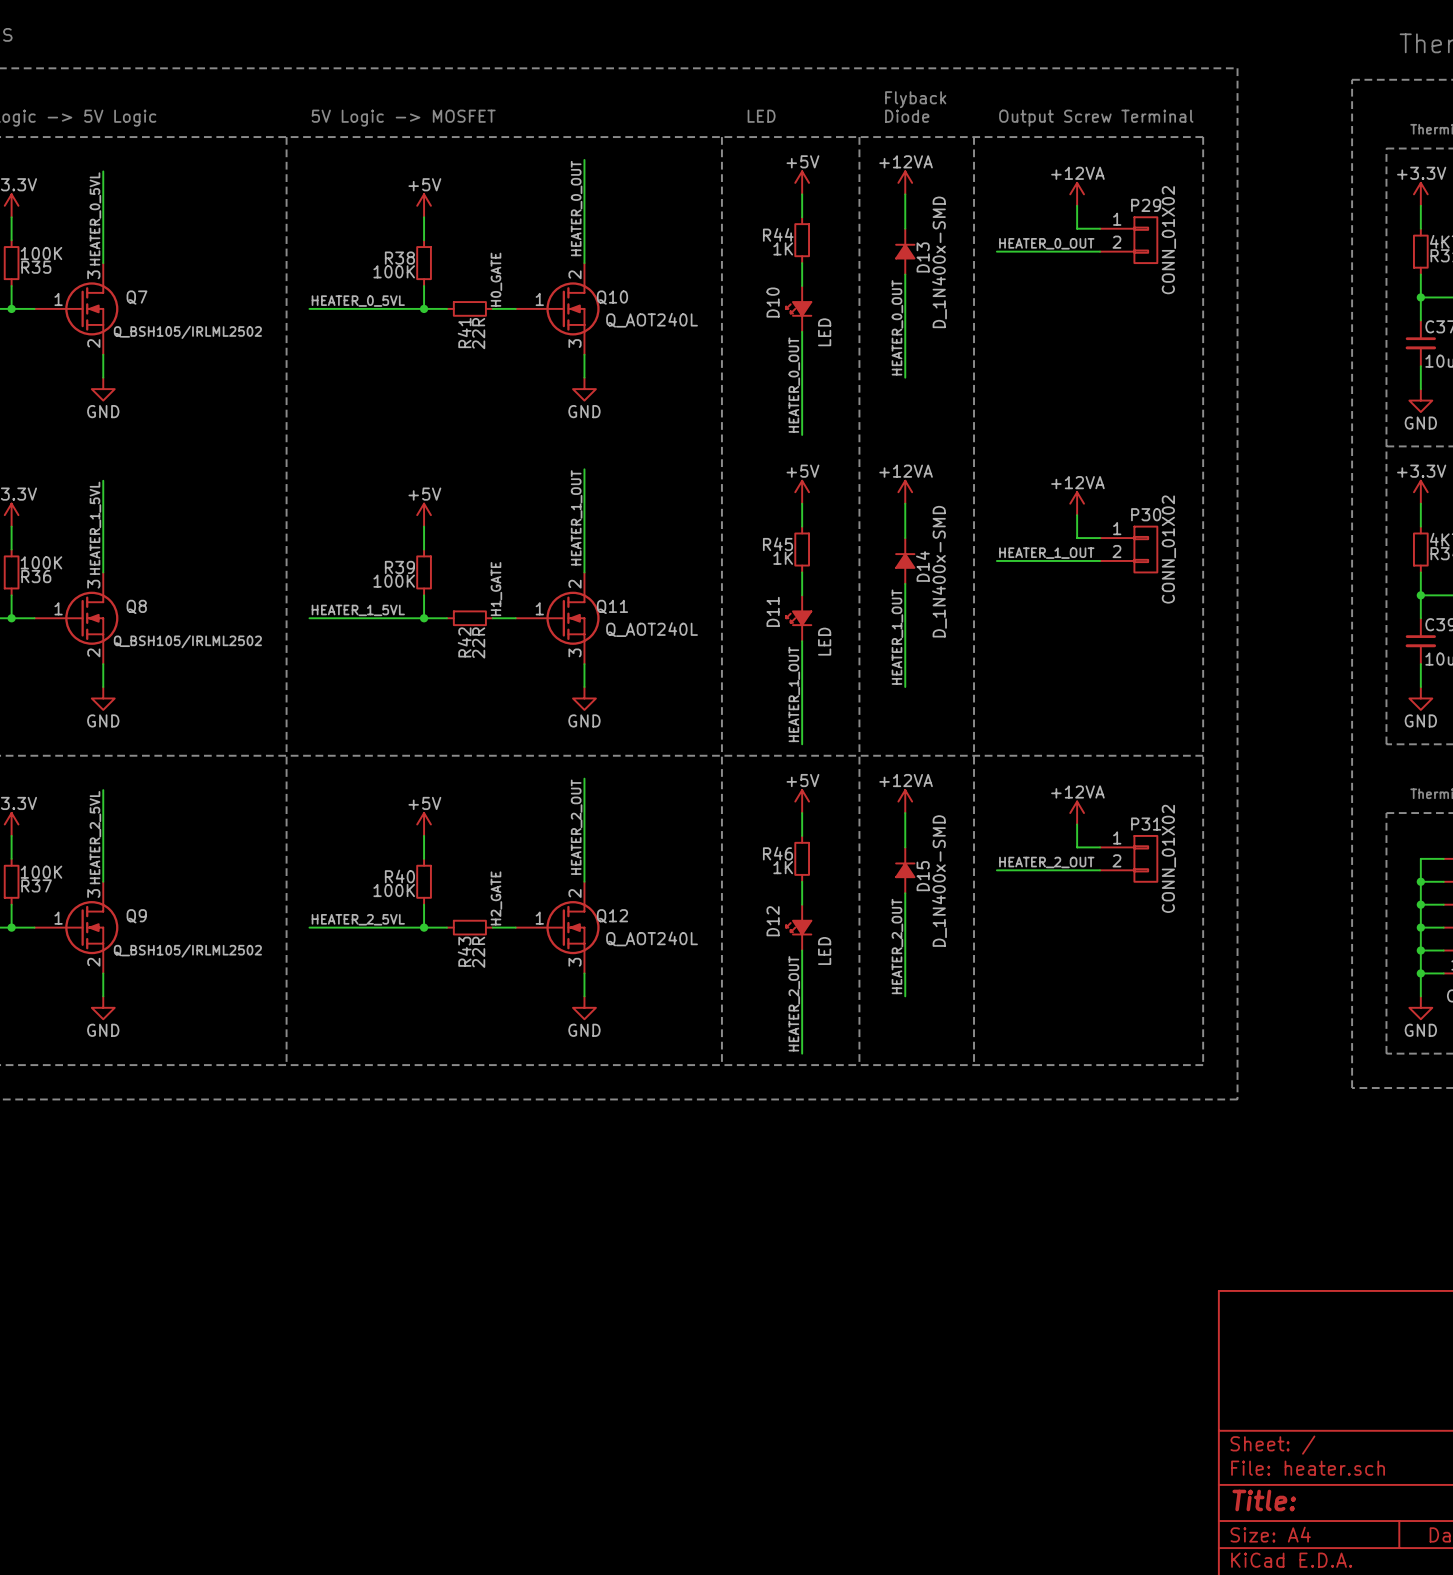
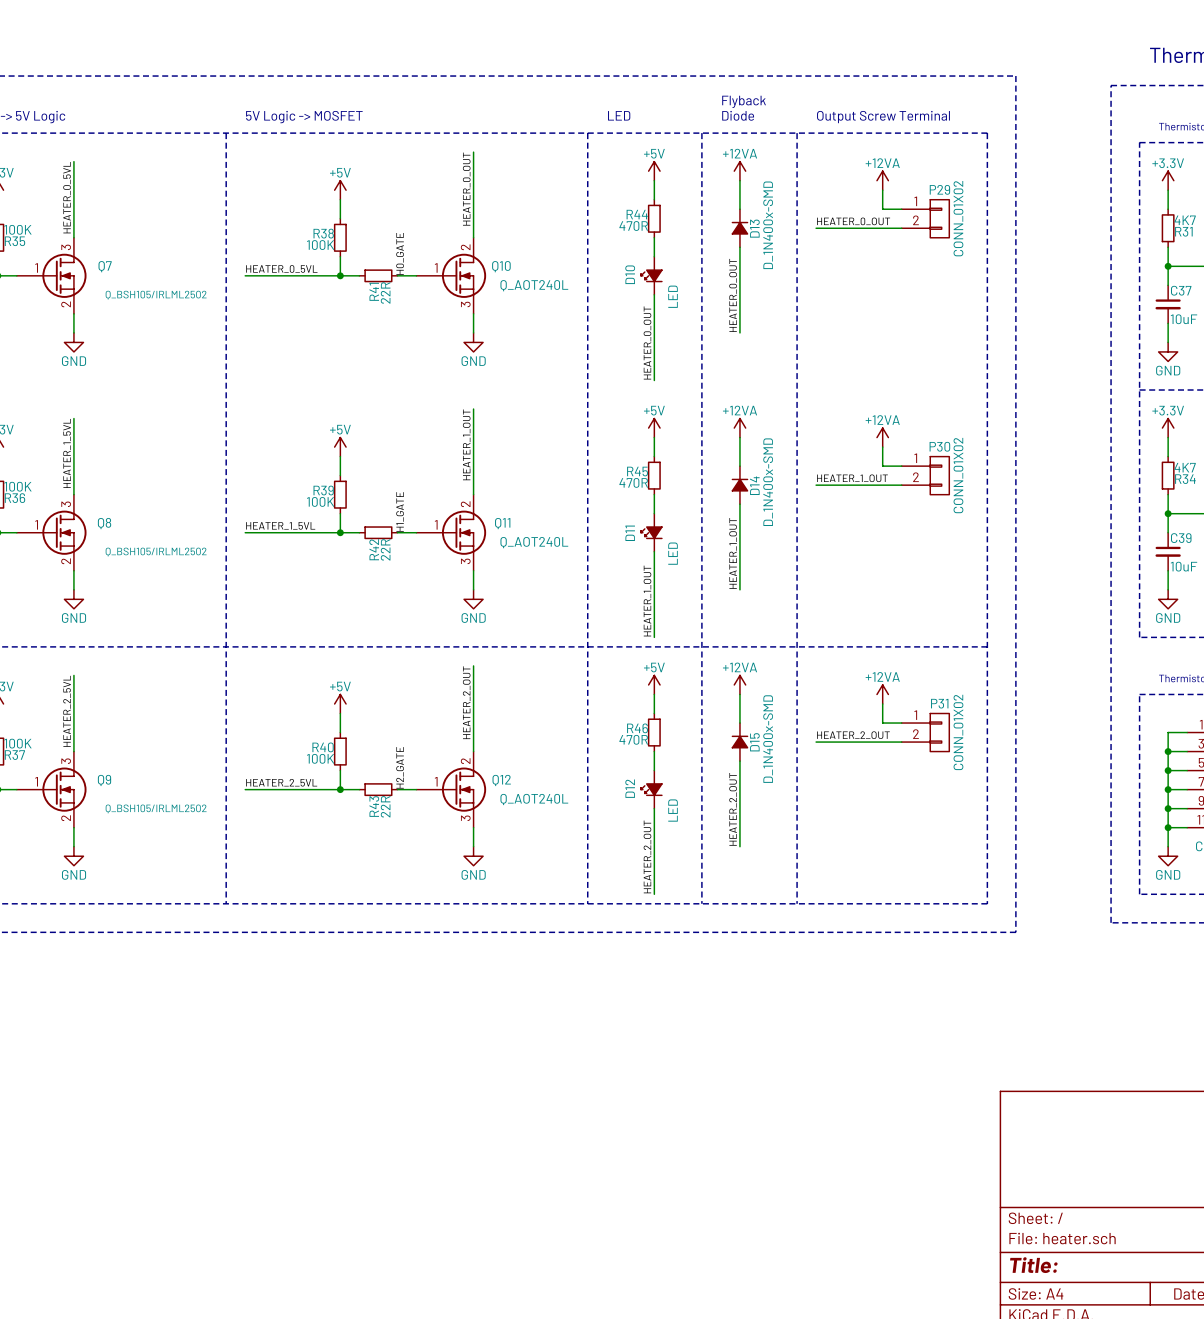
R44 value: 1K (783, 248) -> 470R (633, 226)
R45 value: 1K (783, 558) -> 470R (633, 482)
R46 value: 1K (783, 867) -> 470R (633, 739)

